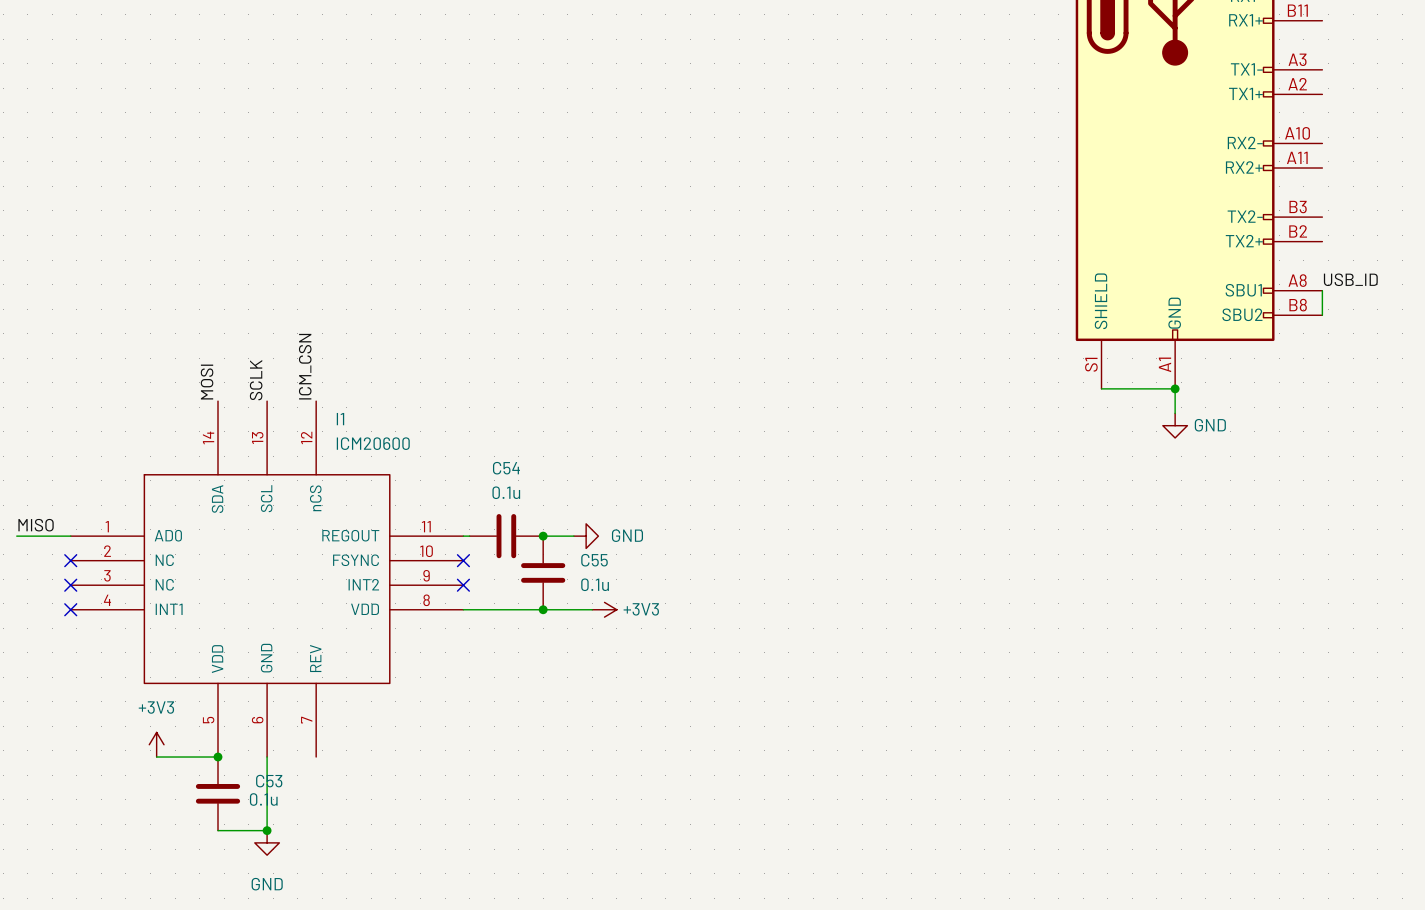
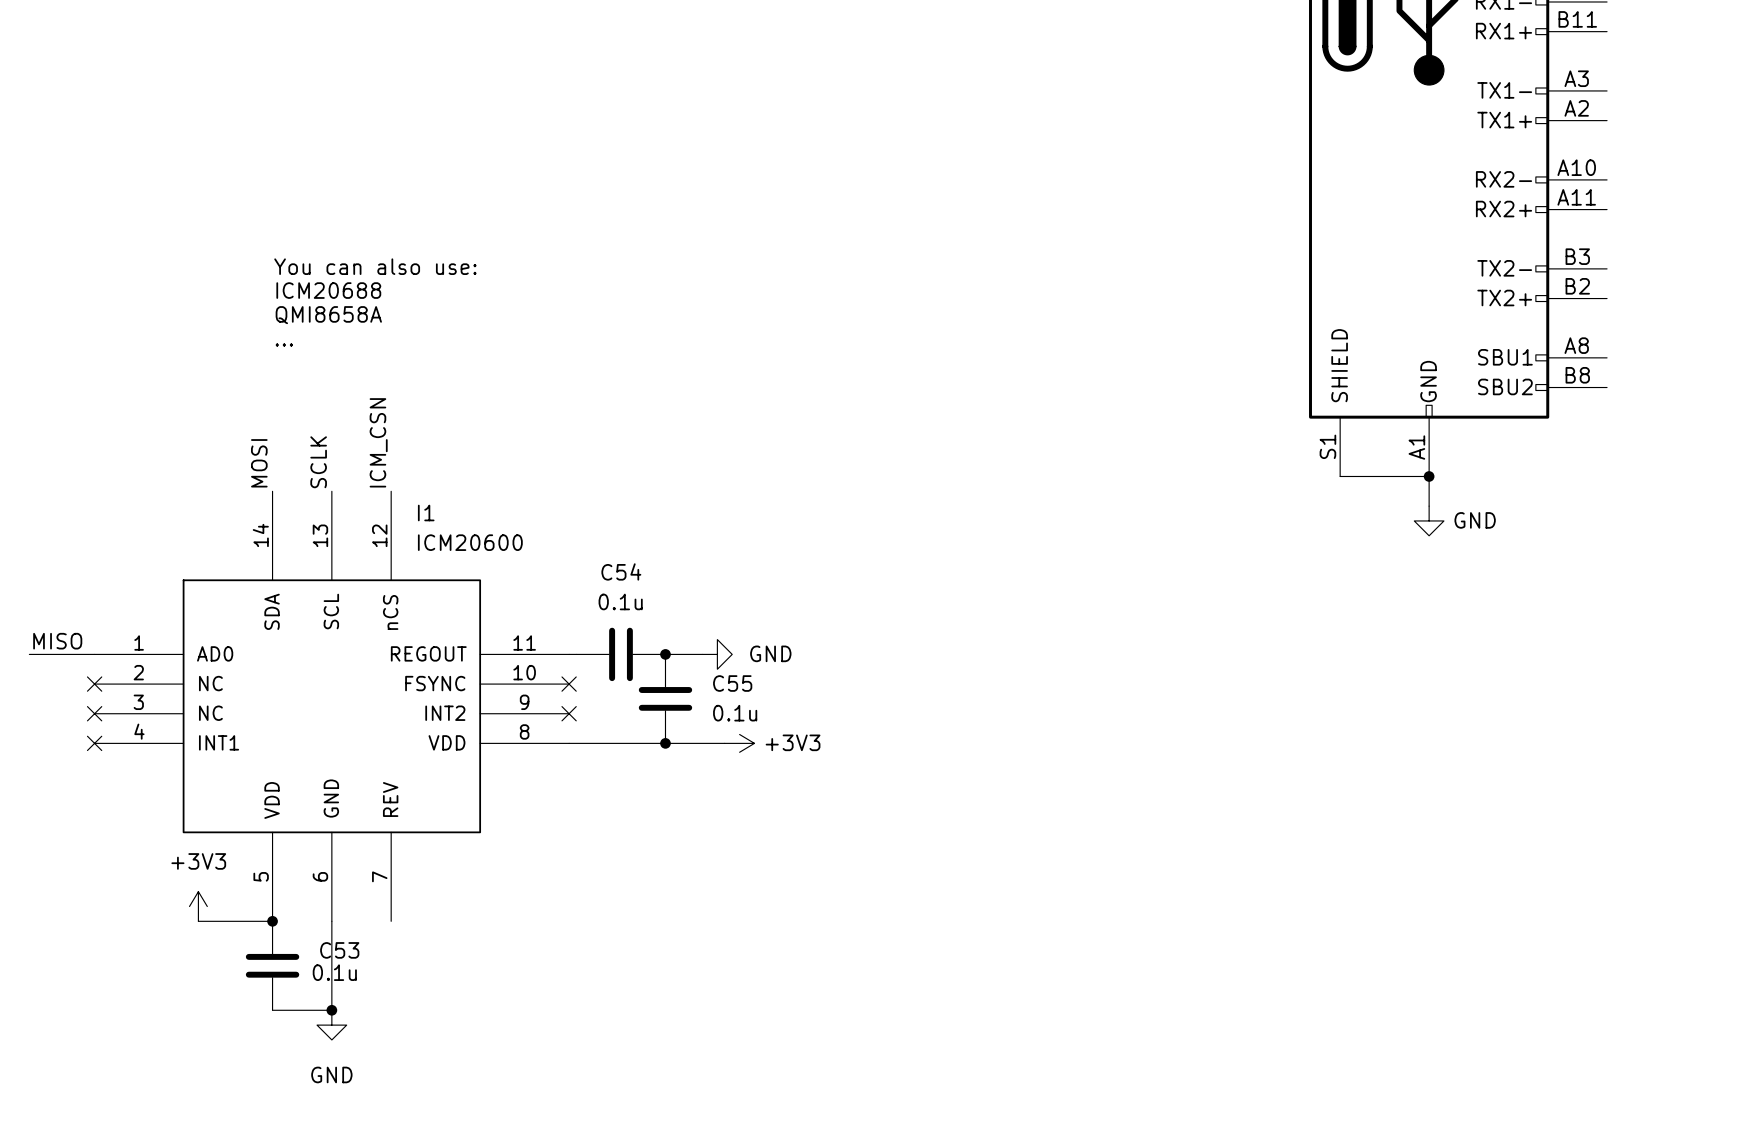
text: none -> You can also use: (375, 266)
text: none -> ICM20688 (328, 290)
text: none -> QMI8658A (328, 315)
text: none -> ... (284, 345)
label: USB_ID (1350, 279) -> none
wire: (1322, 290) (1322, 315) -> none

